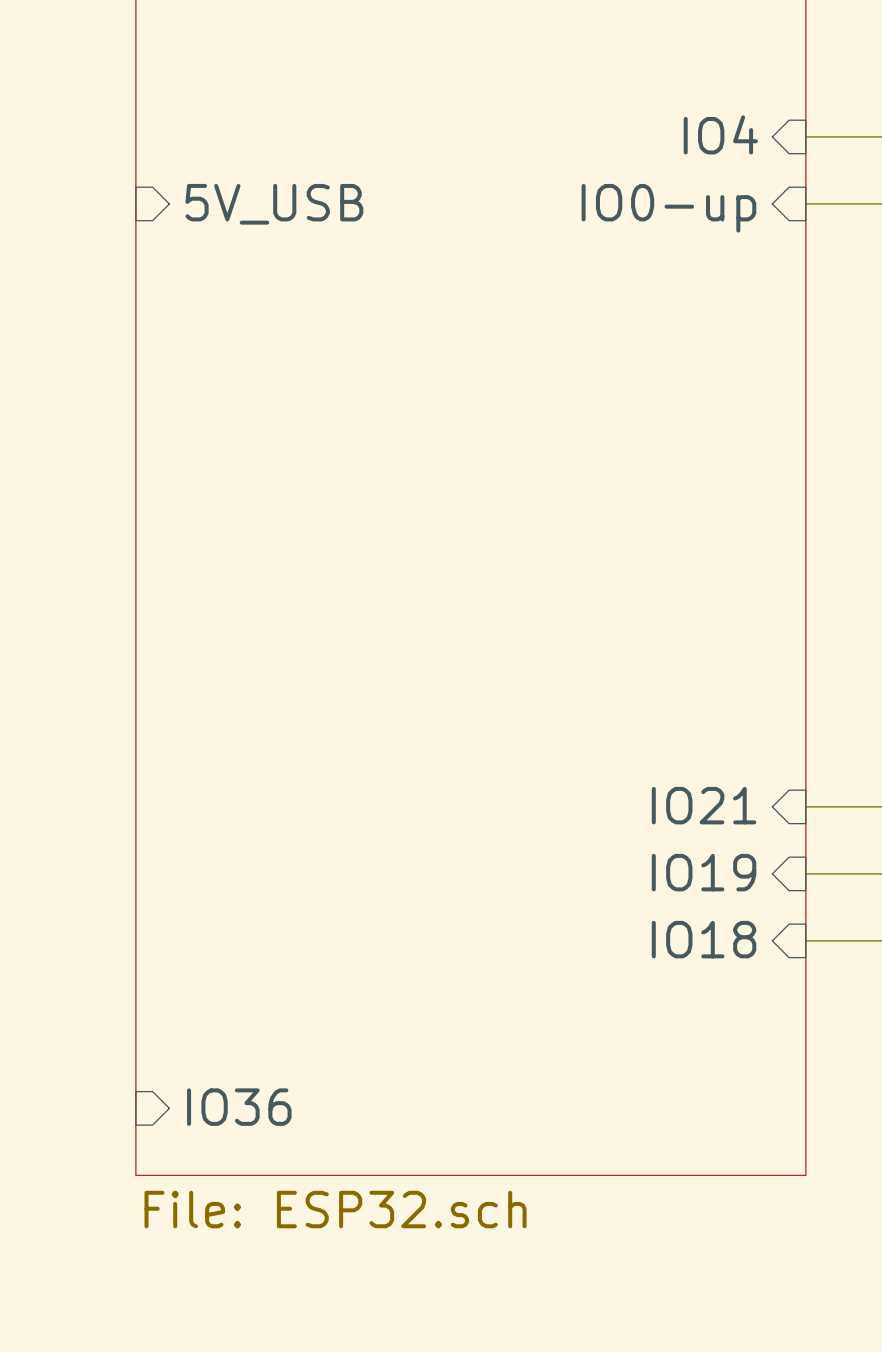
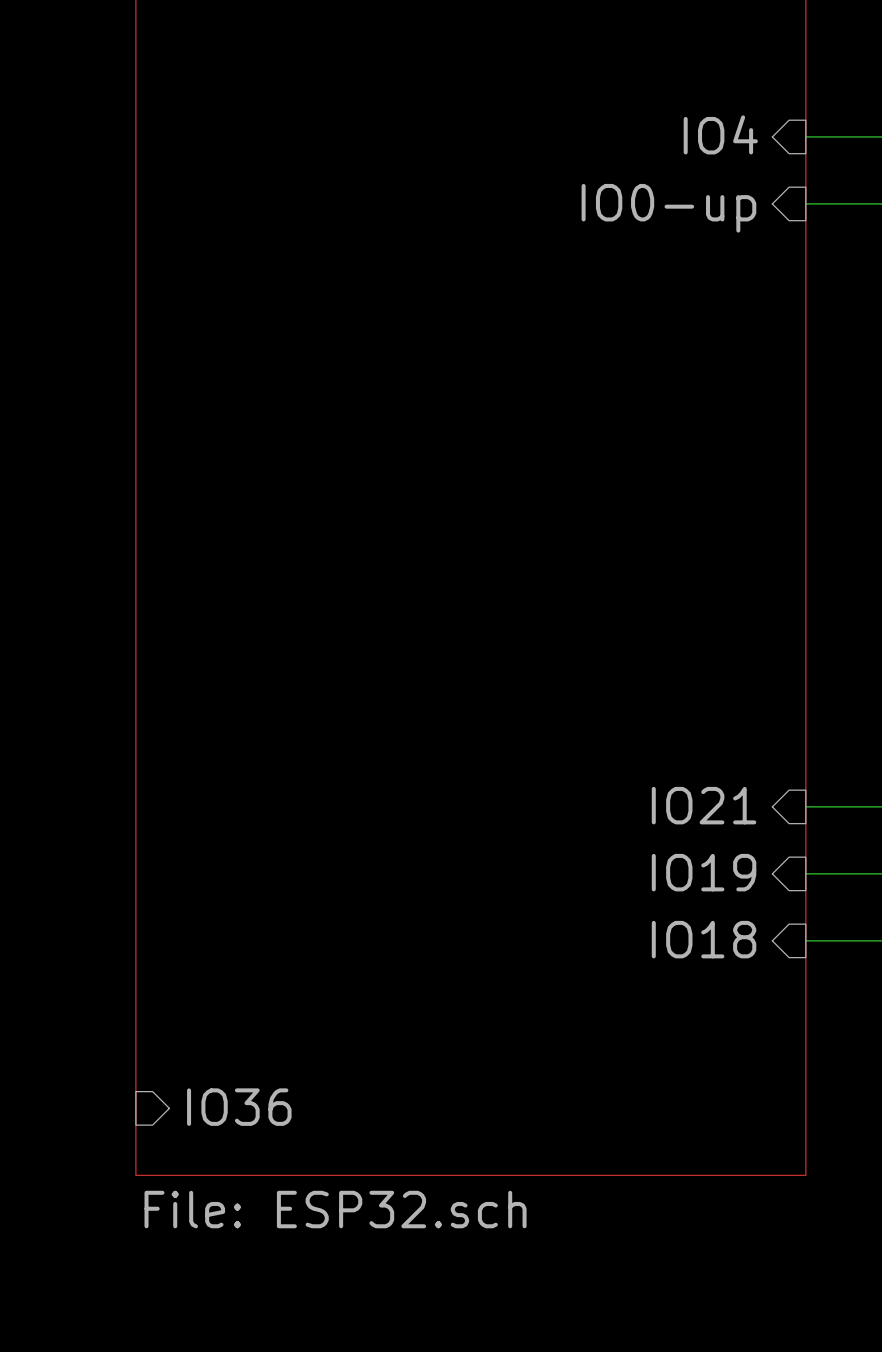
sheet pin: 5V_USB (274, 204) -> none

